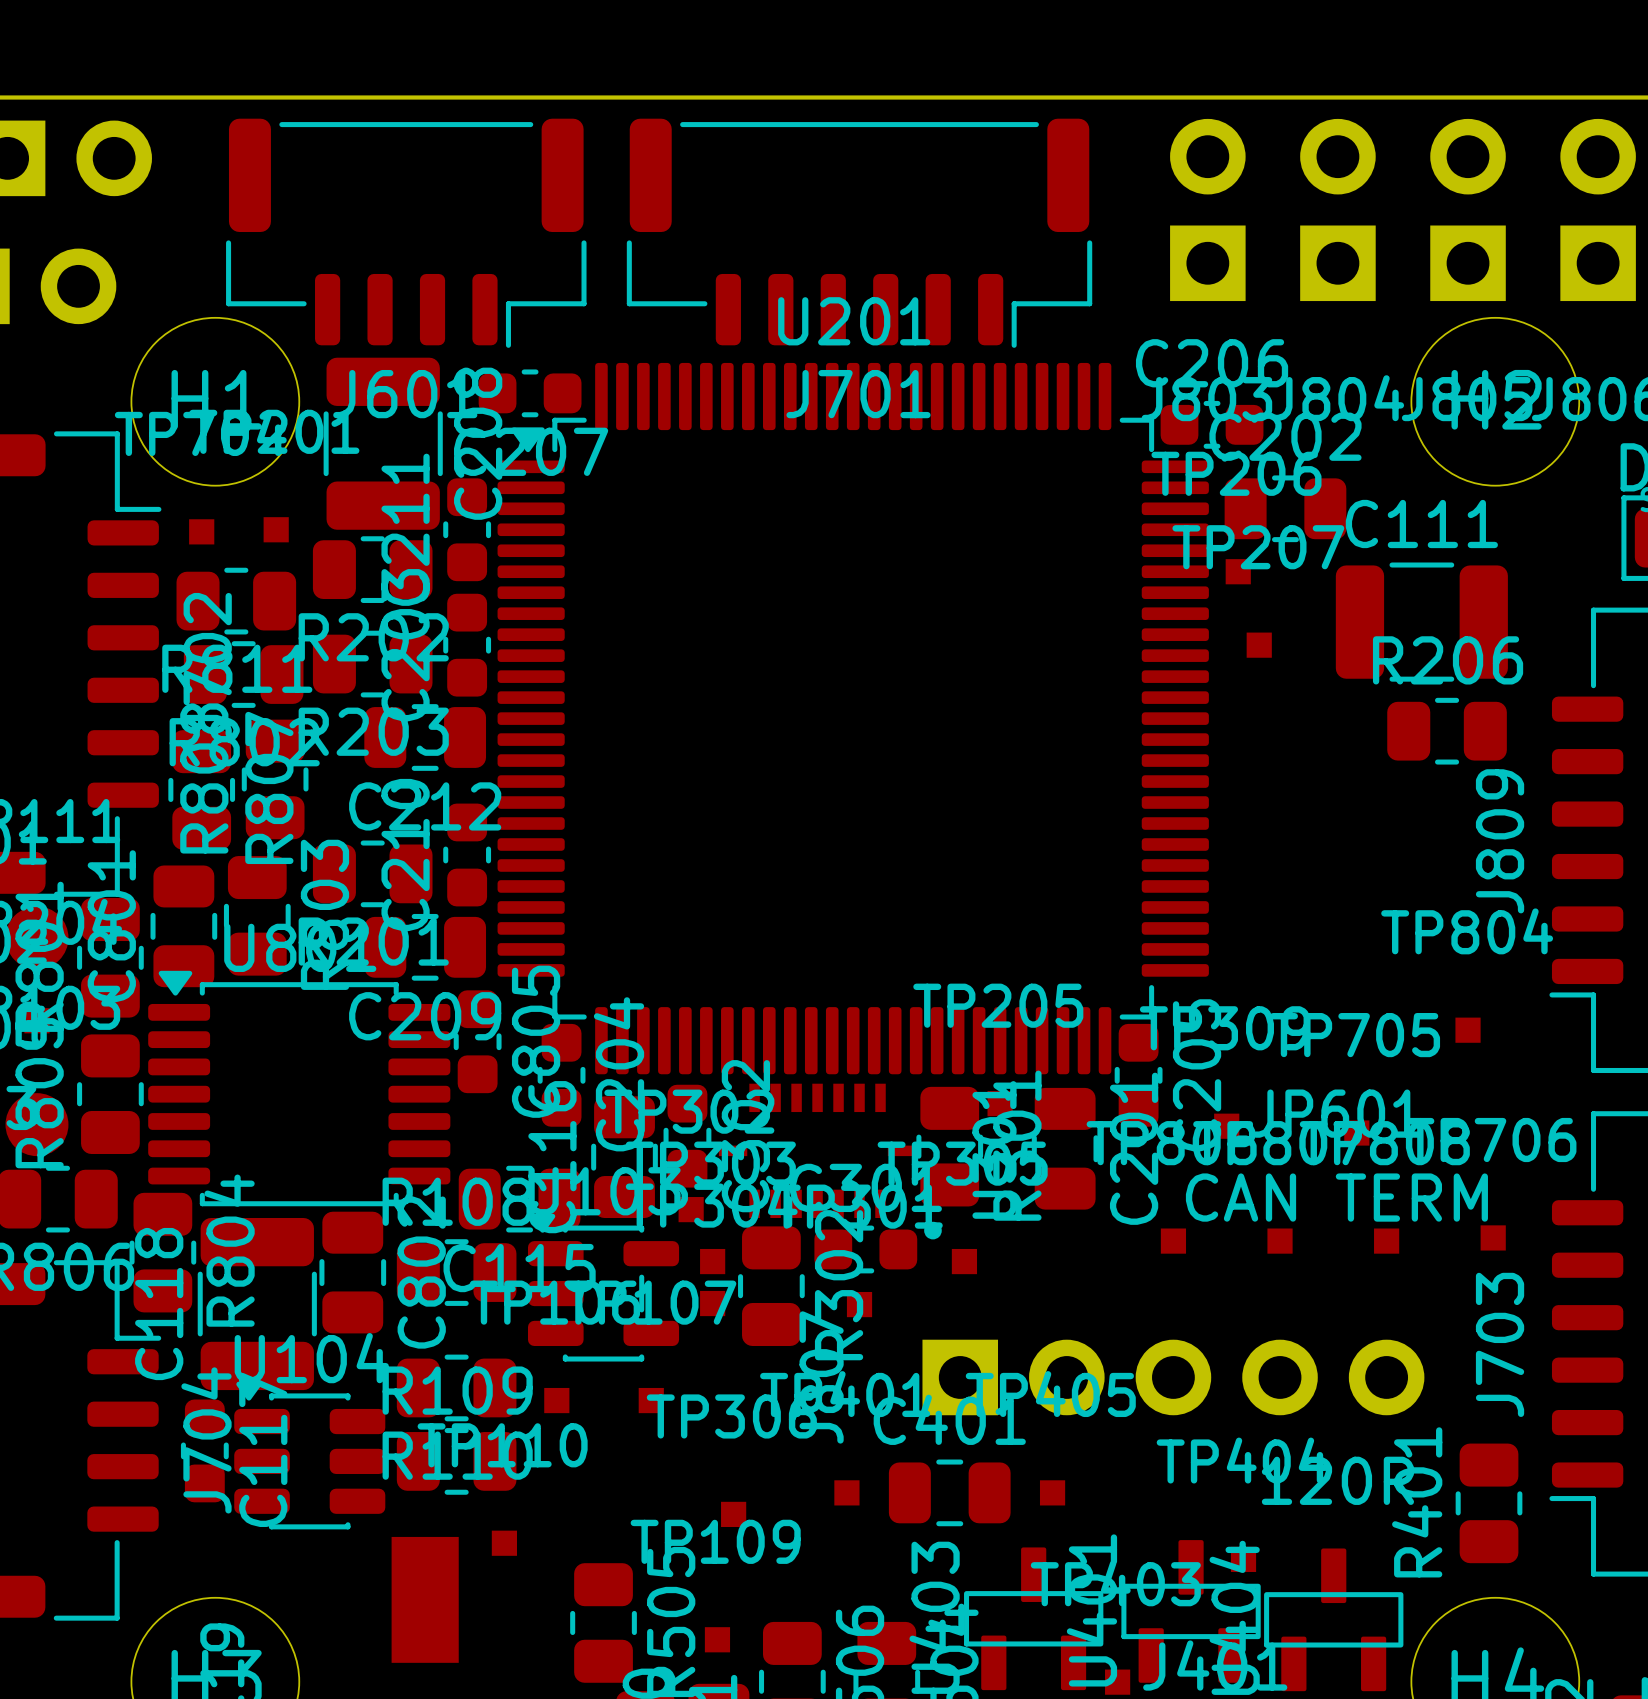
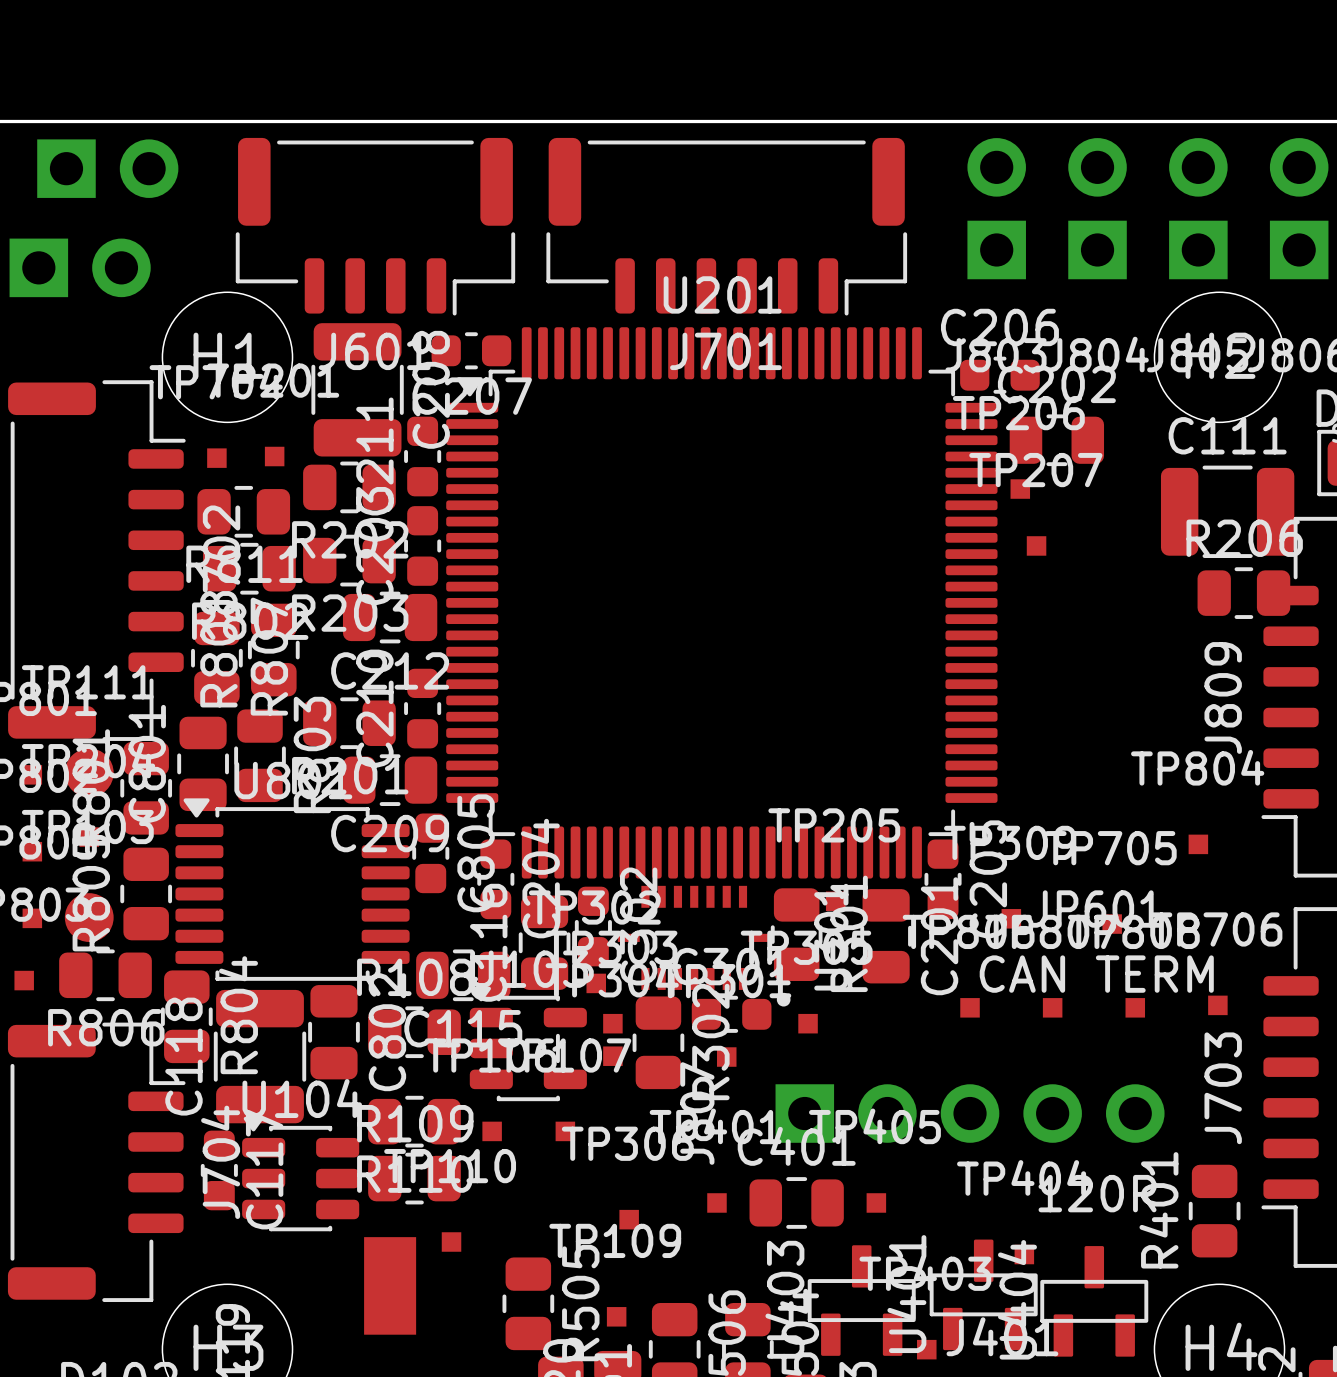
C111 position: (1421, 622) -> (1227, 511)
R206 position: (1447, 731) -> (1243, 593)

